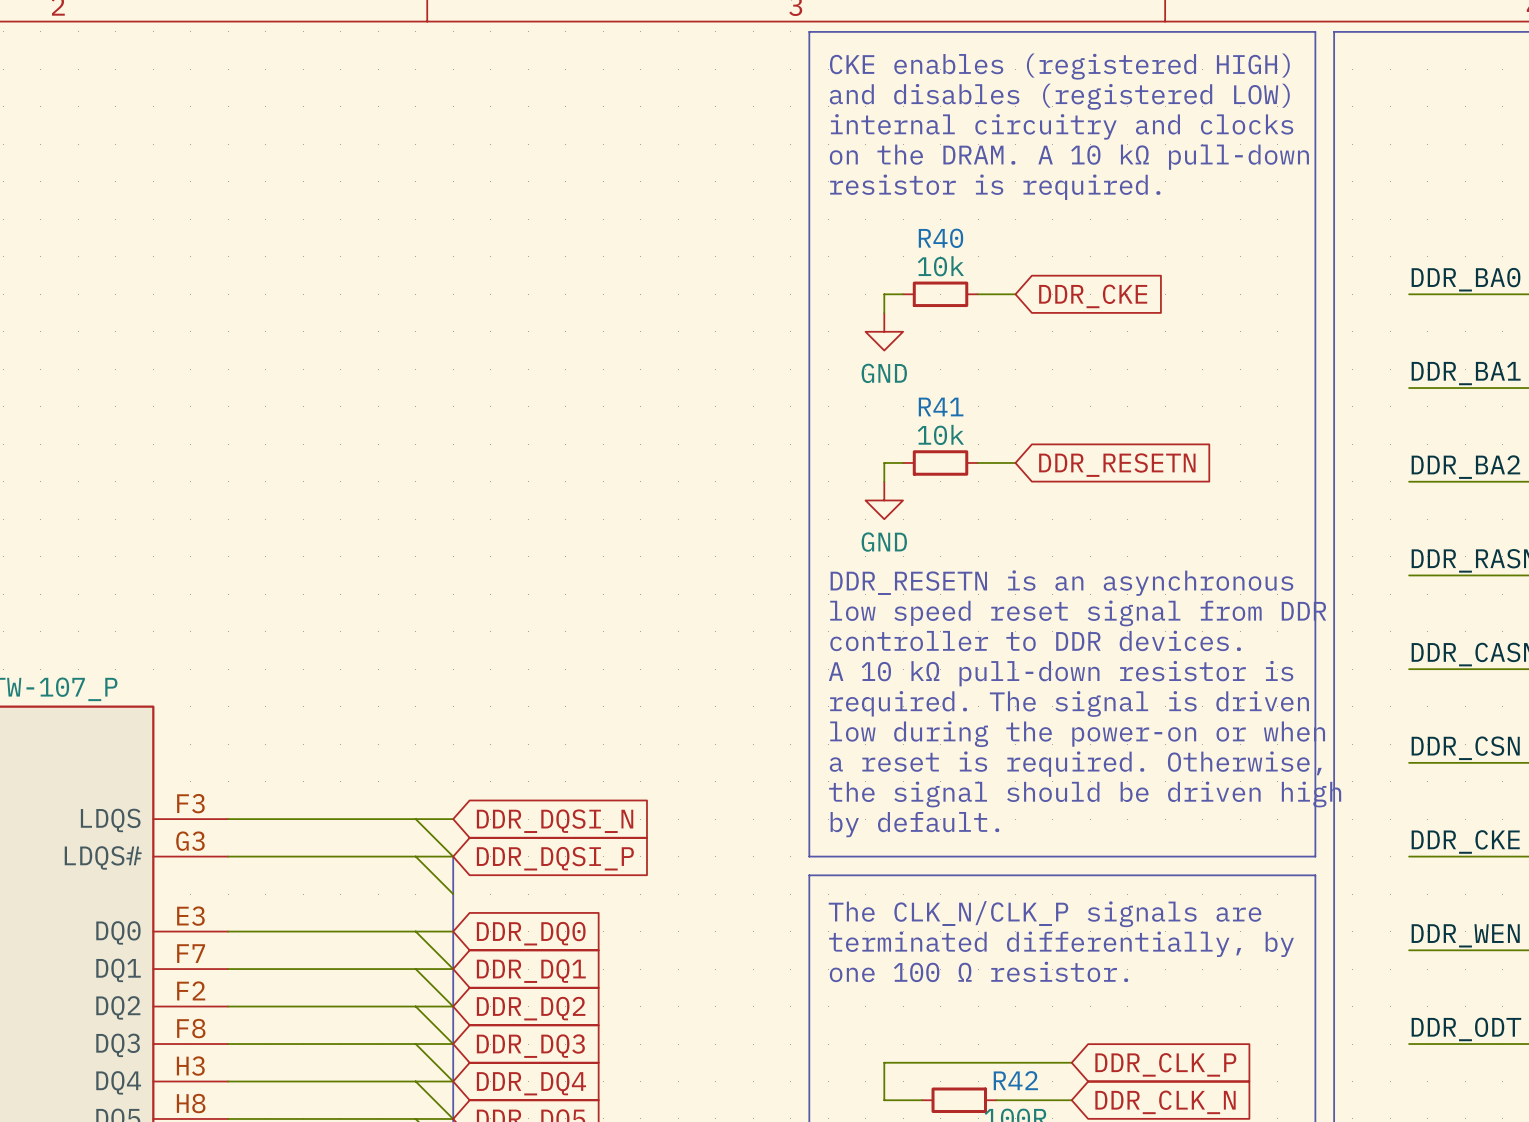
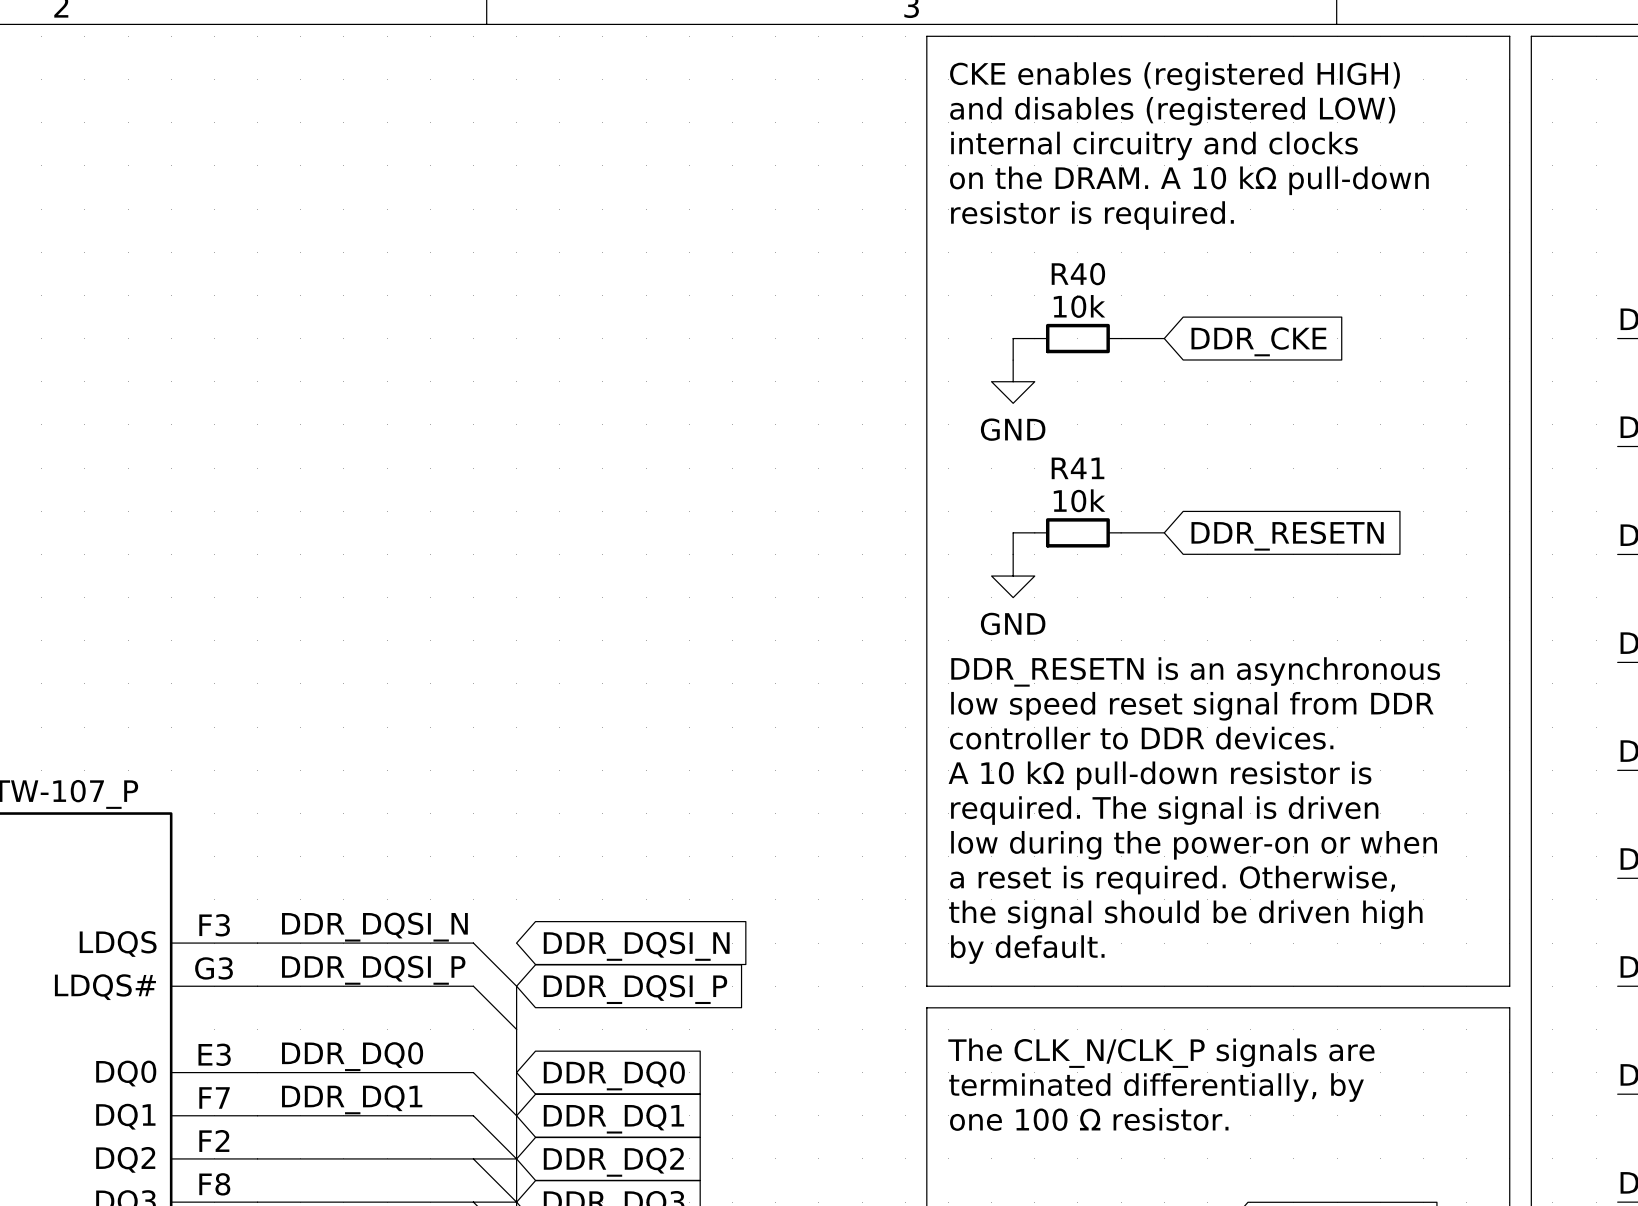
label: none -> DDR_DQSI_N (374, 927)
wire: (415, 819) (453, 819) -> none
label: none -> DDR_DQSI_P (373, 970)
wire: (415, 856) (453, 856) -> none
label: none -> DDR_DQ0 (352, 1056)
wire: (415, 931) (453, 931) -> none
label: none -> DDR_DQ1 (352, 1099)
wire: (415, 969) (453, 969) -> none

